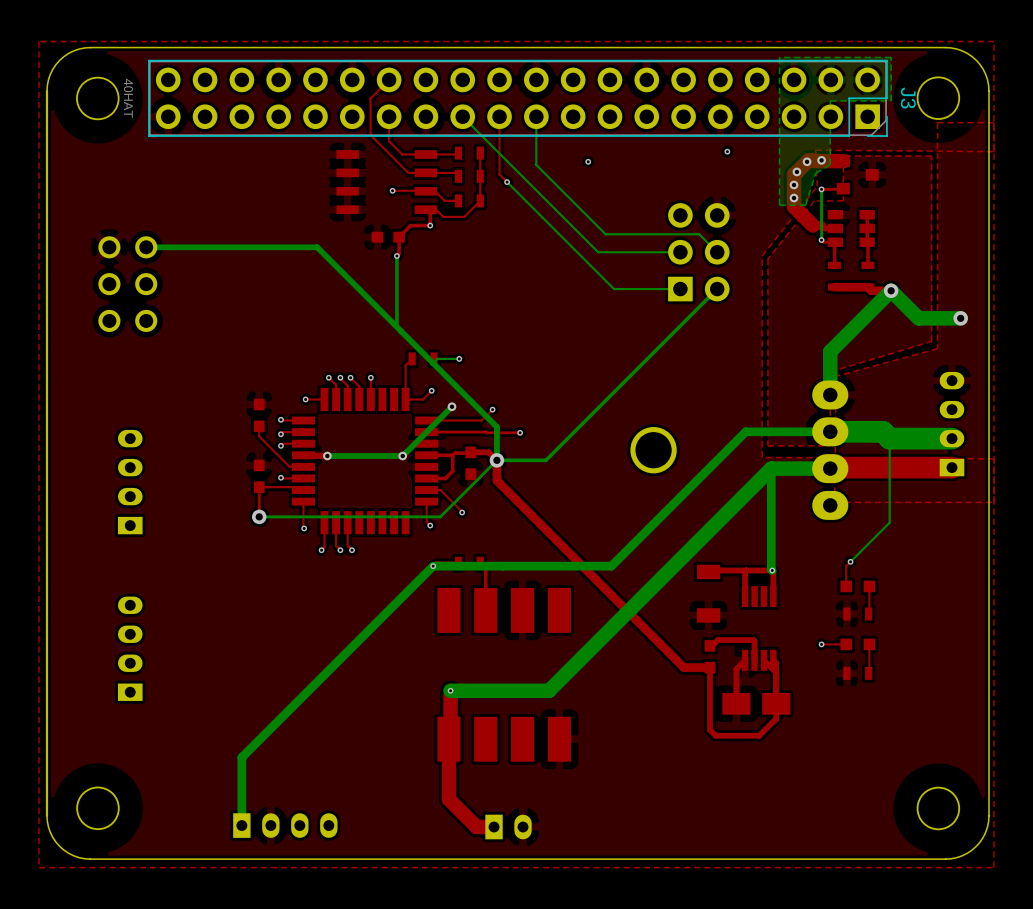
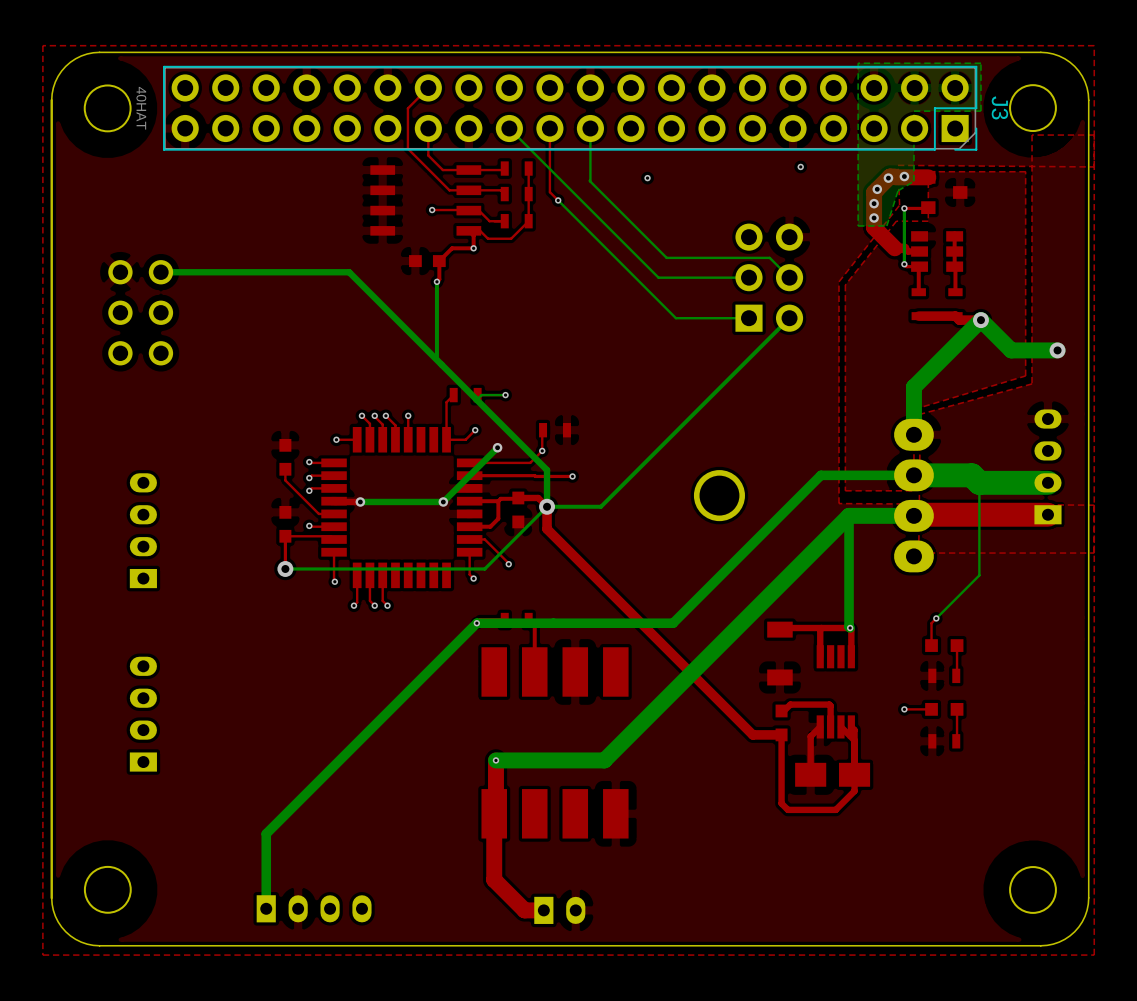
top track: none -> (543, 430) (542, 450)
part: none -> (555, 430)

